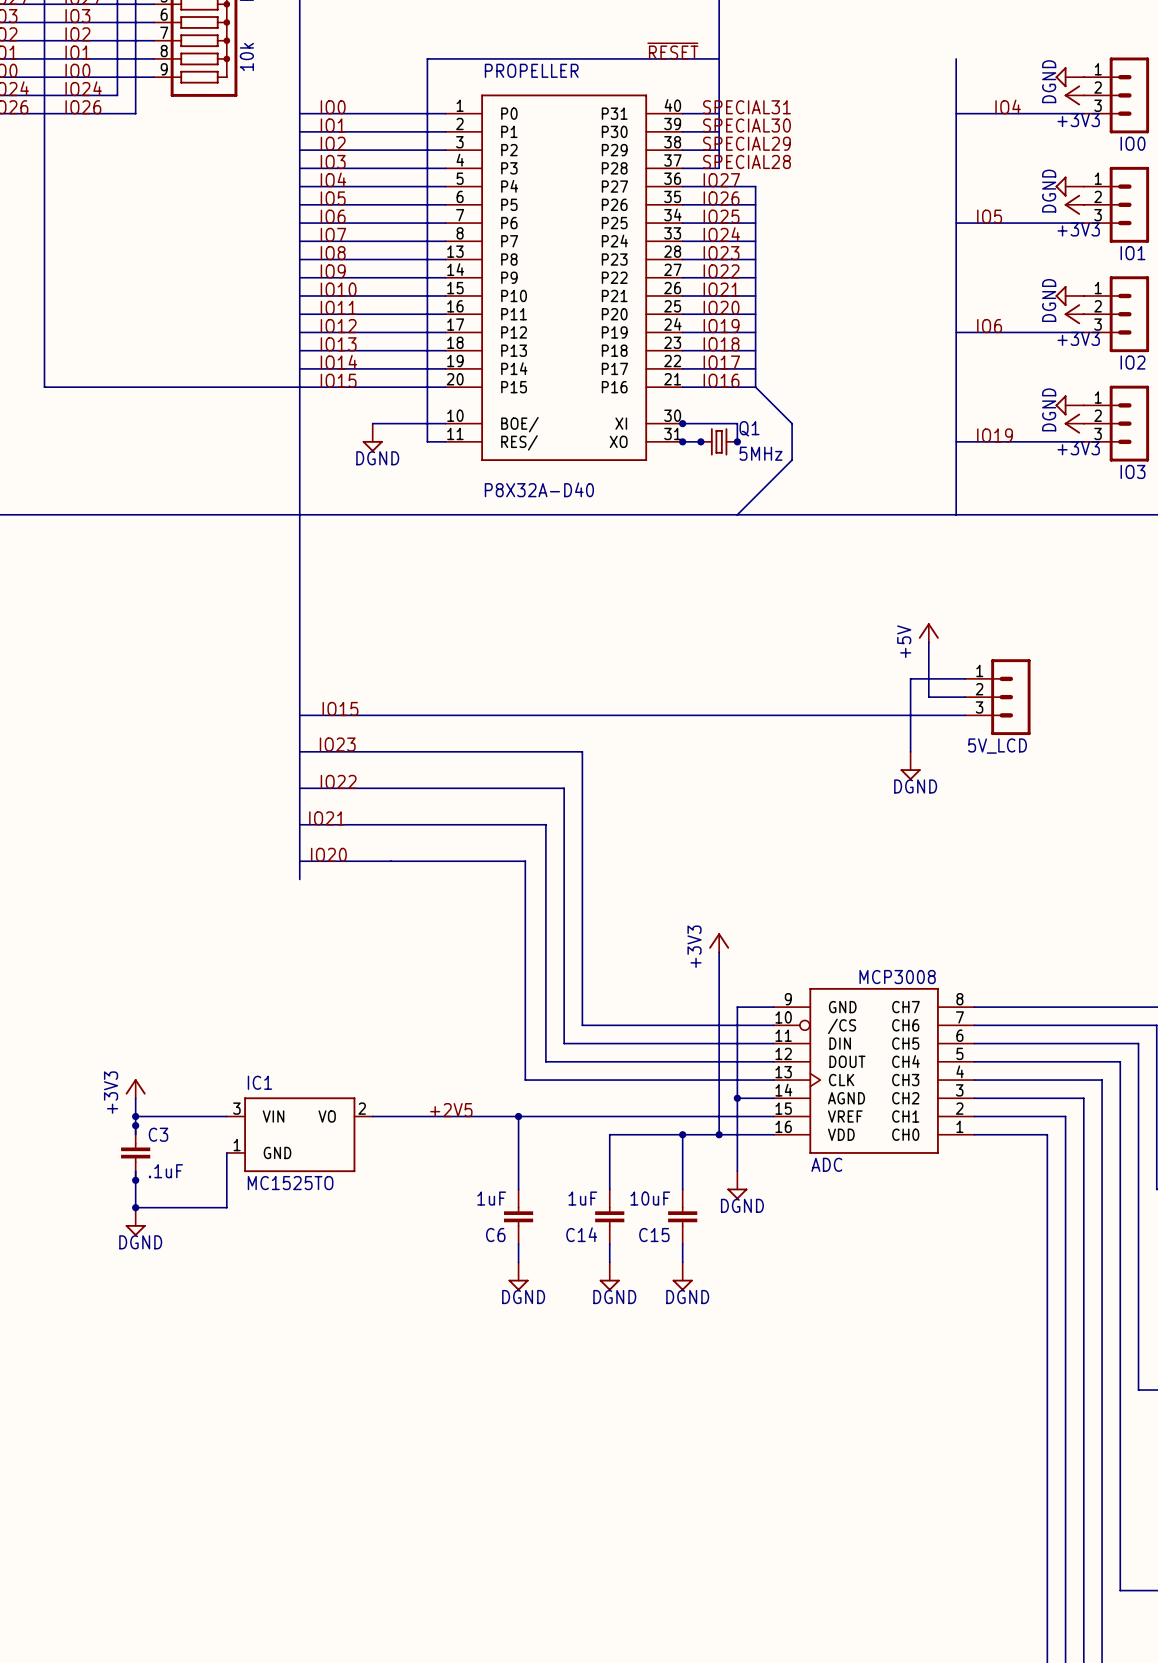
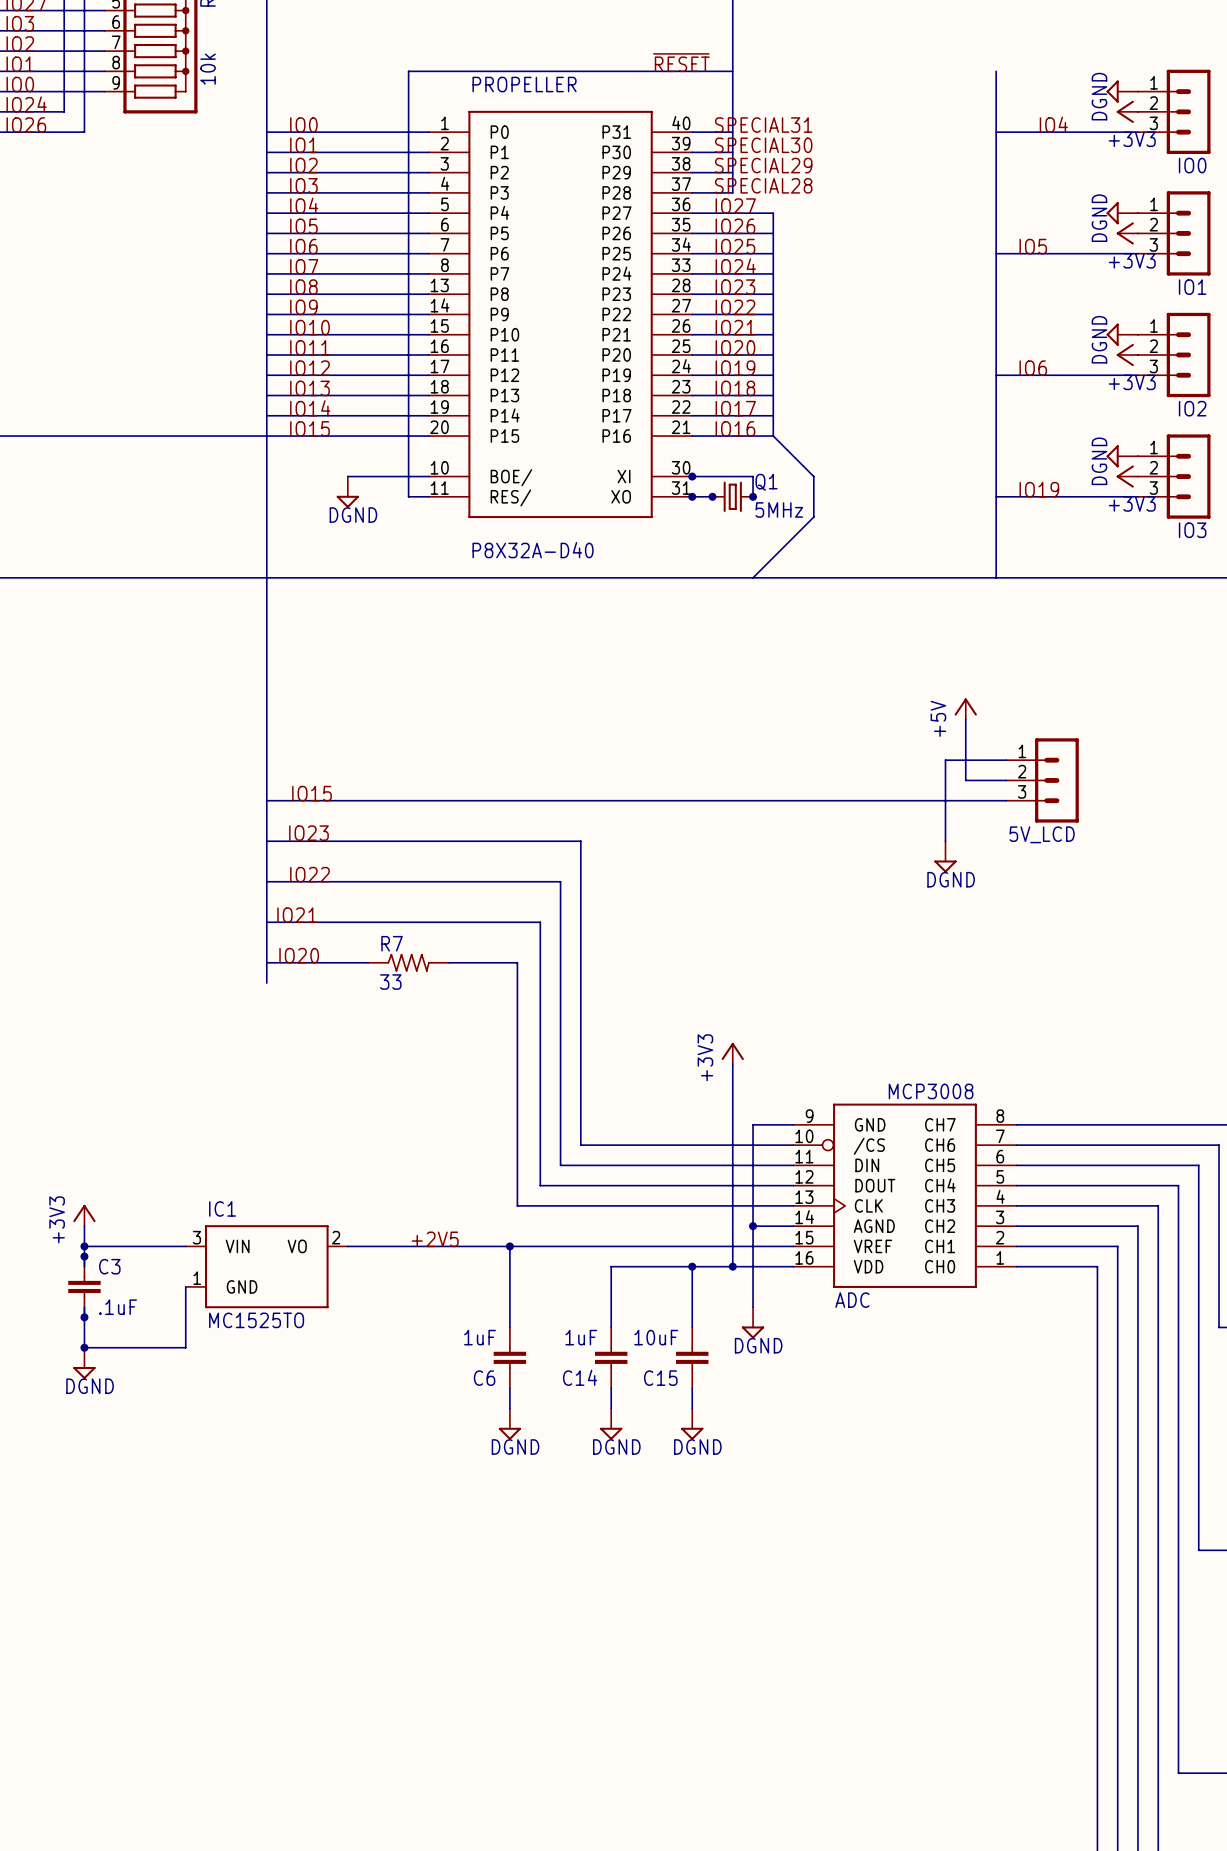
R7: none -> 33 (408, 962)

